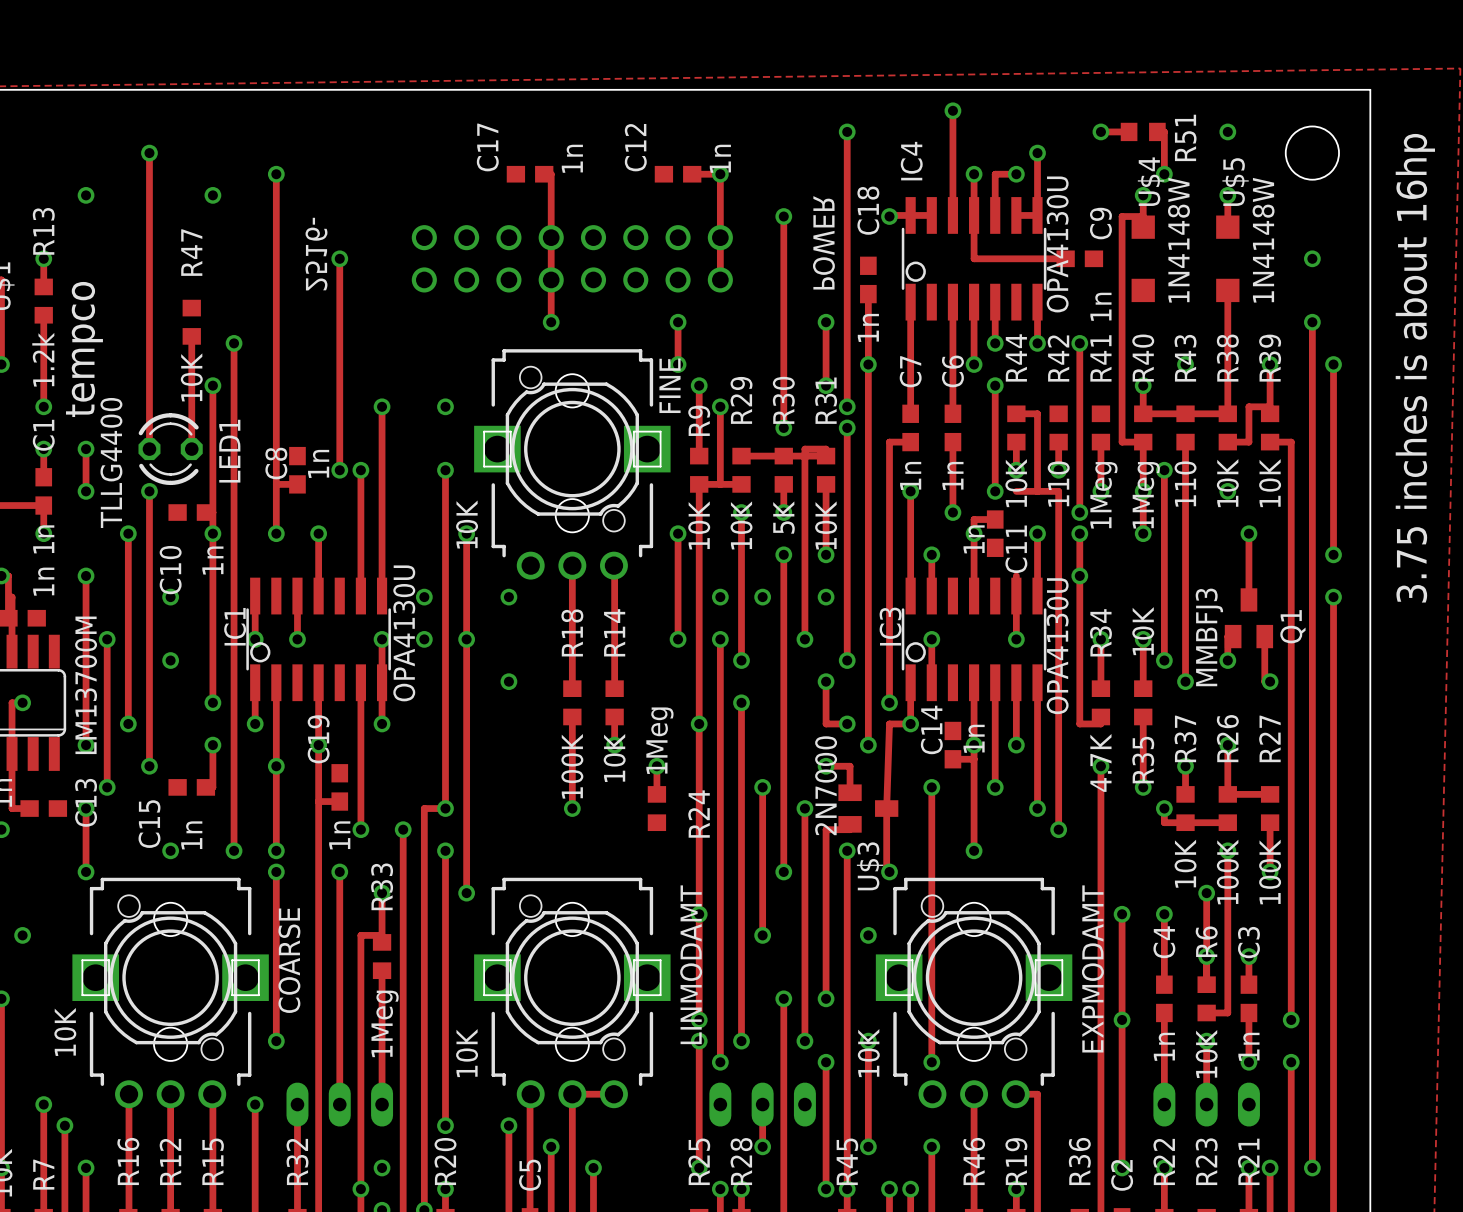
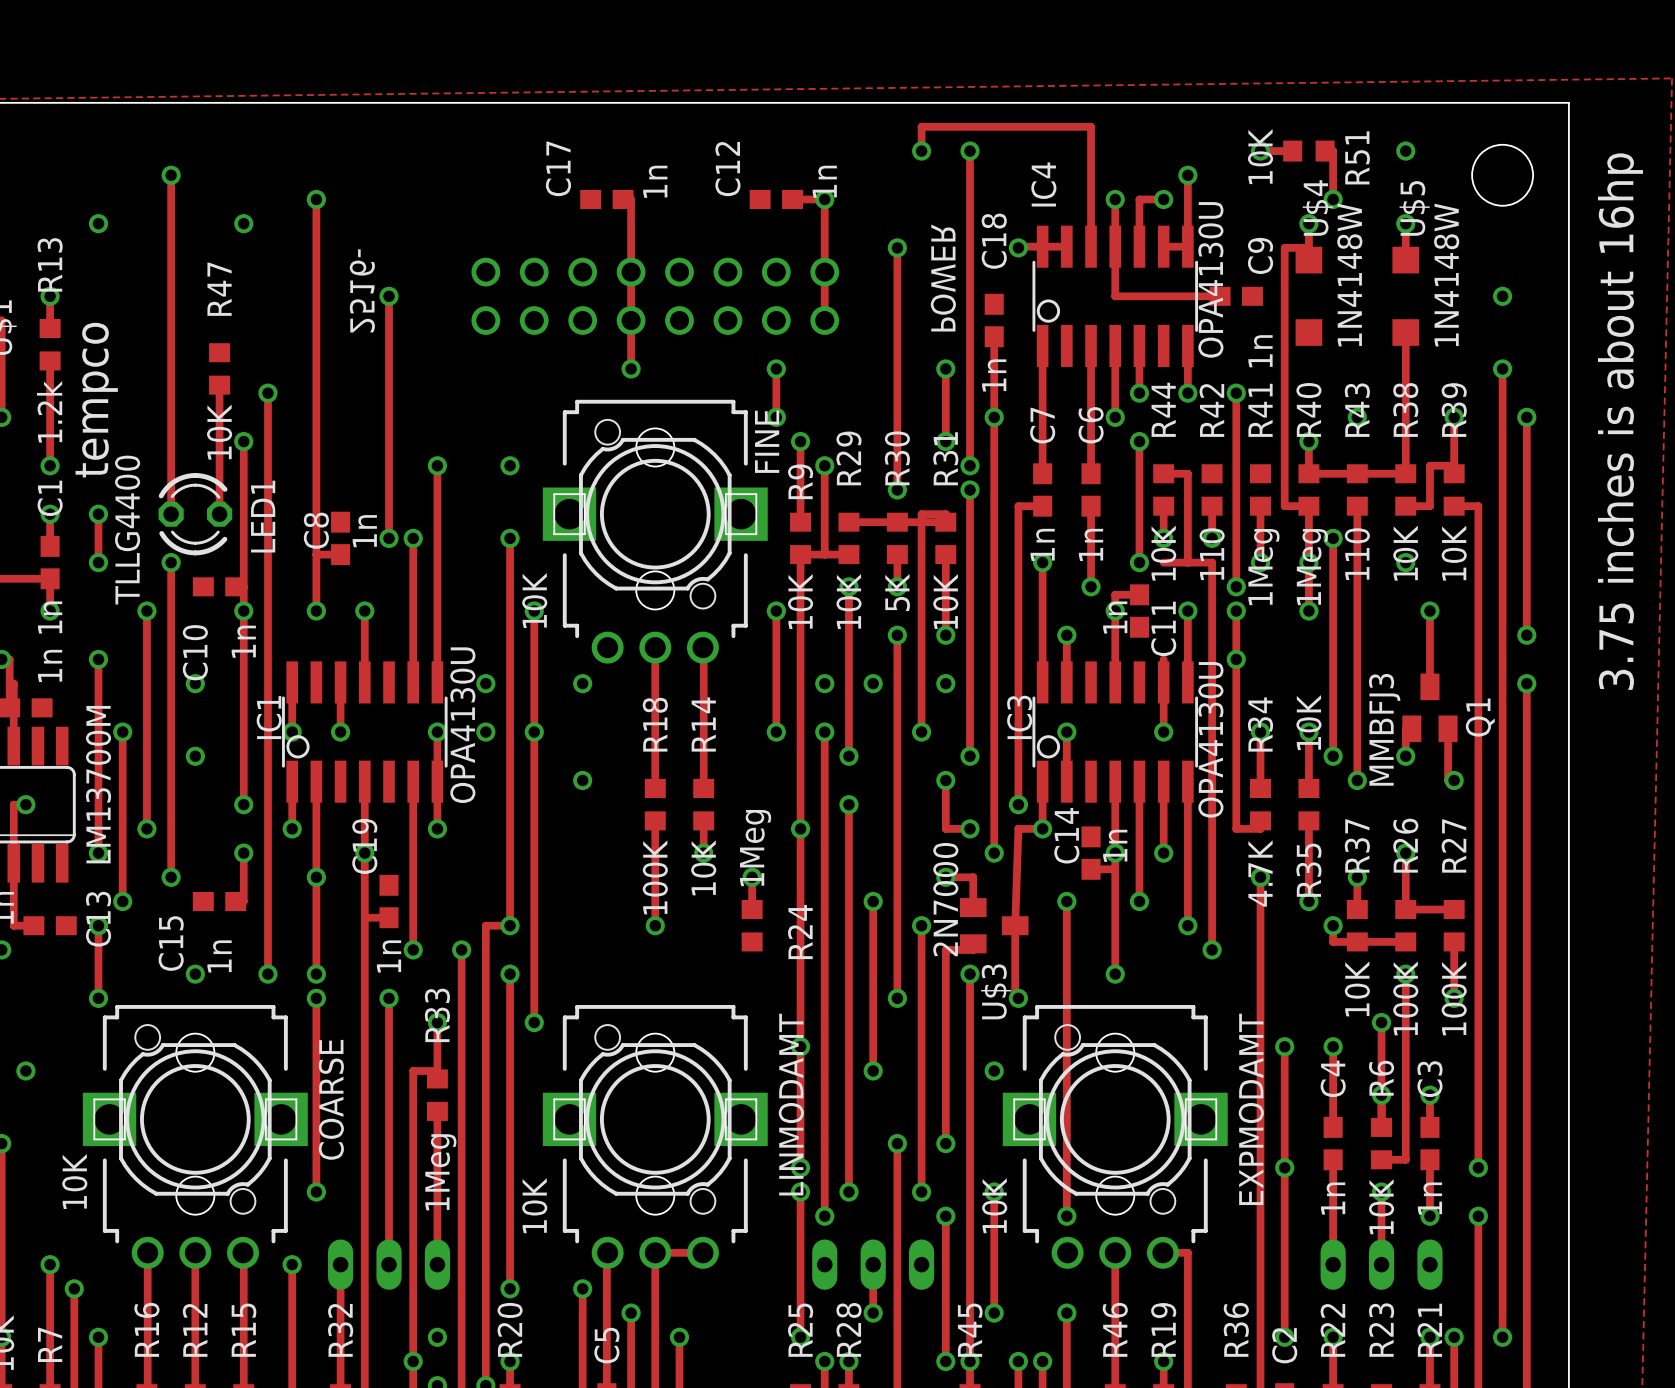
track: none -> (1091, 126) (921, 126) (921, 151)
via: (952, 110) -> none
via: none -> (921, 151)
R51 value: none -> 10K (1260, 156)

